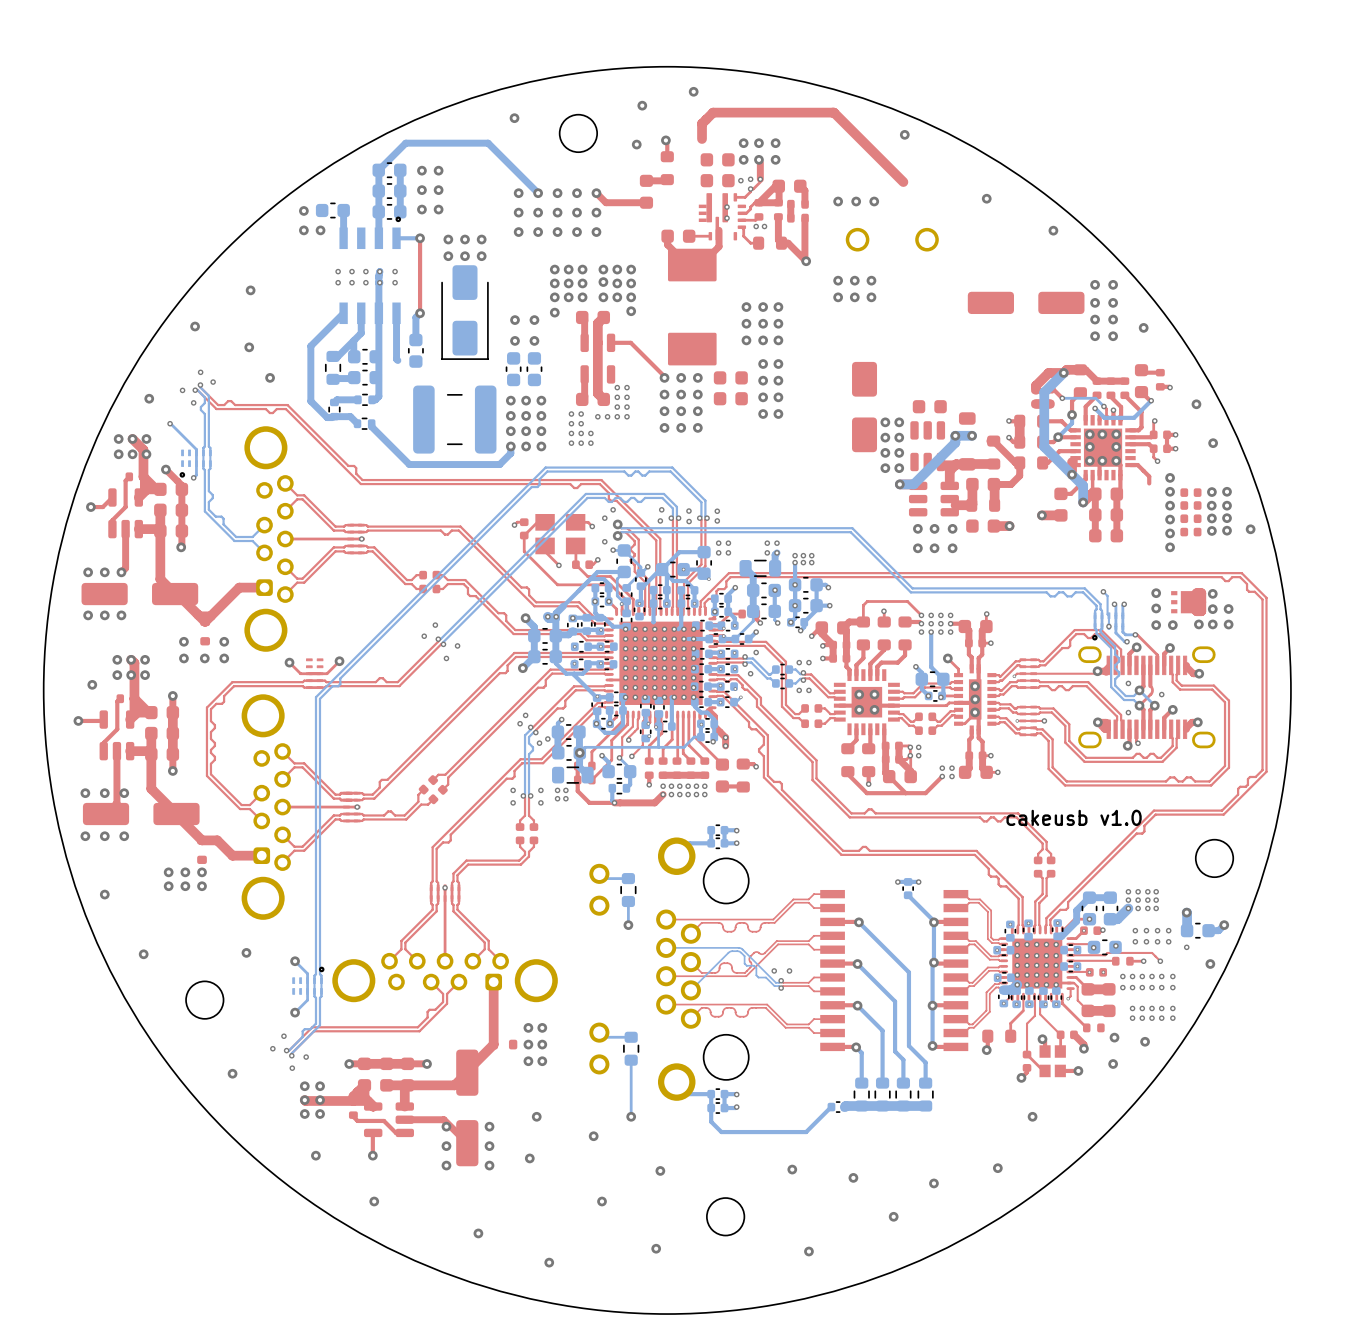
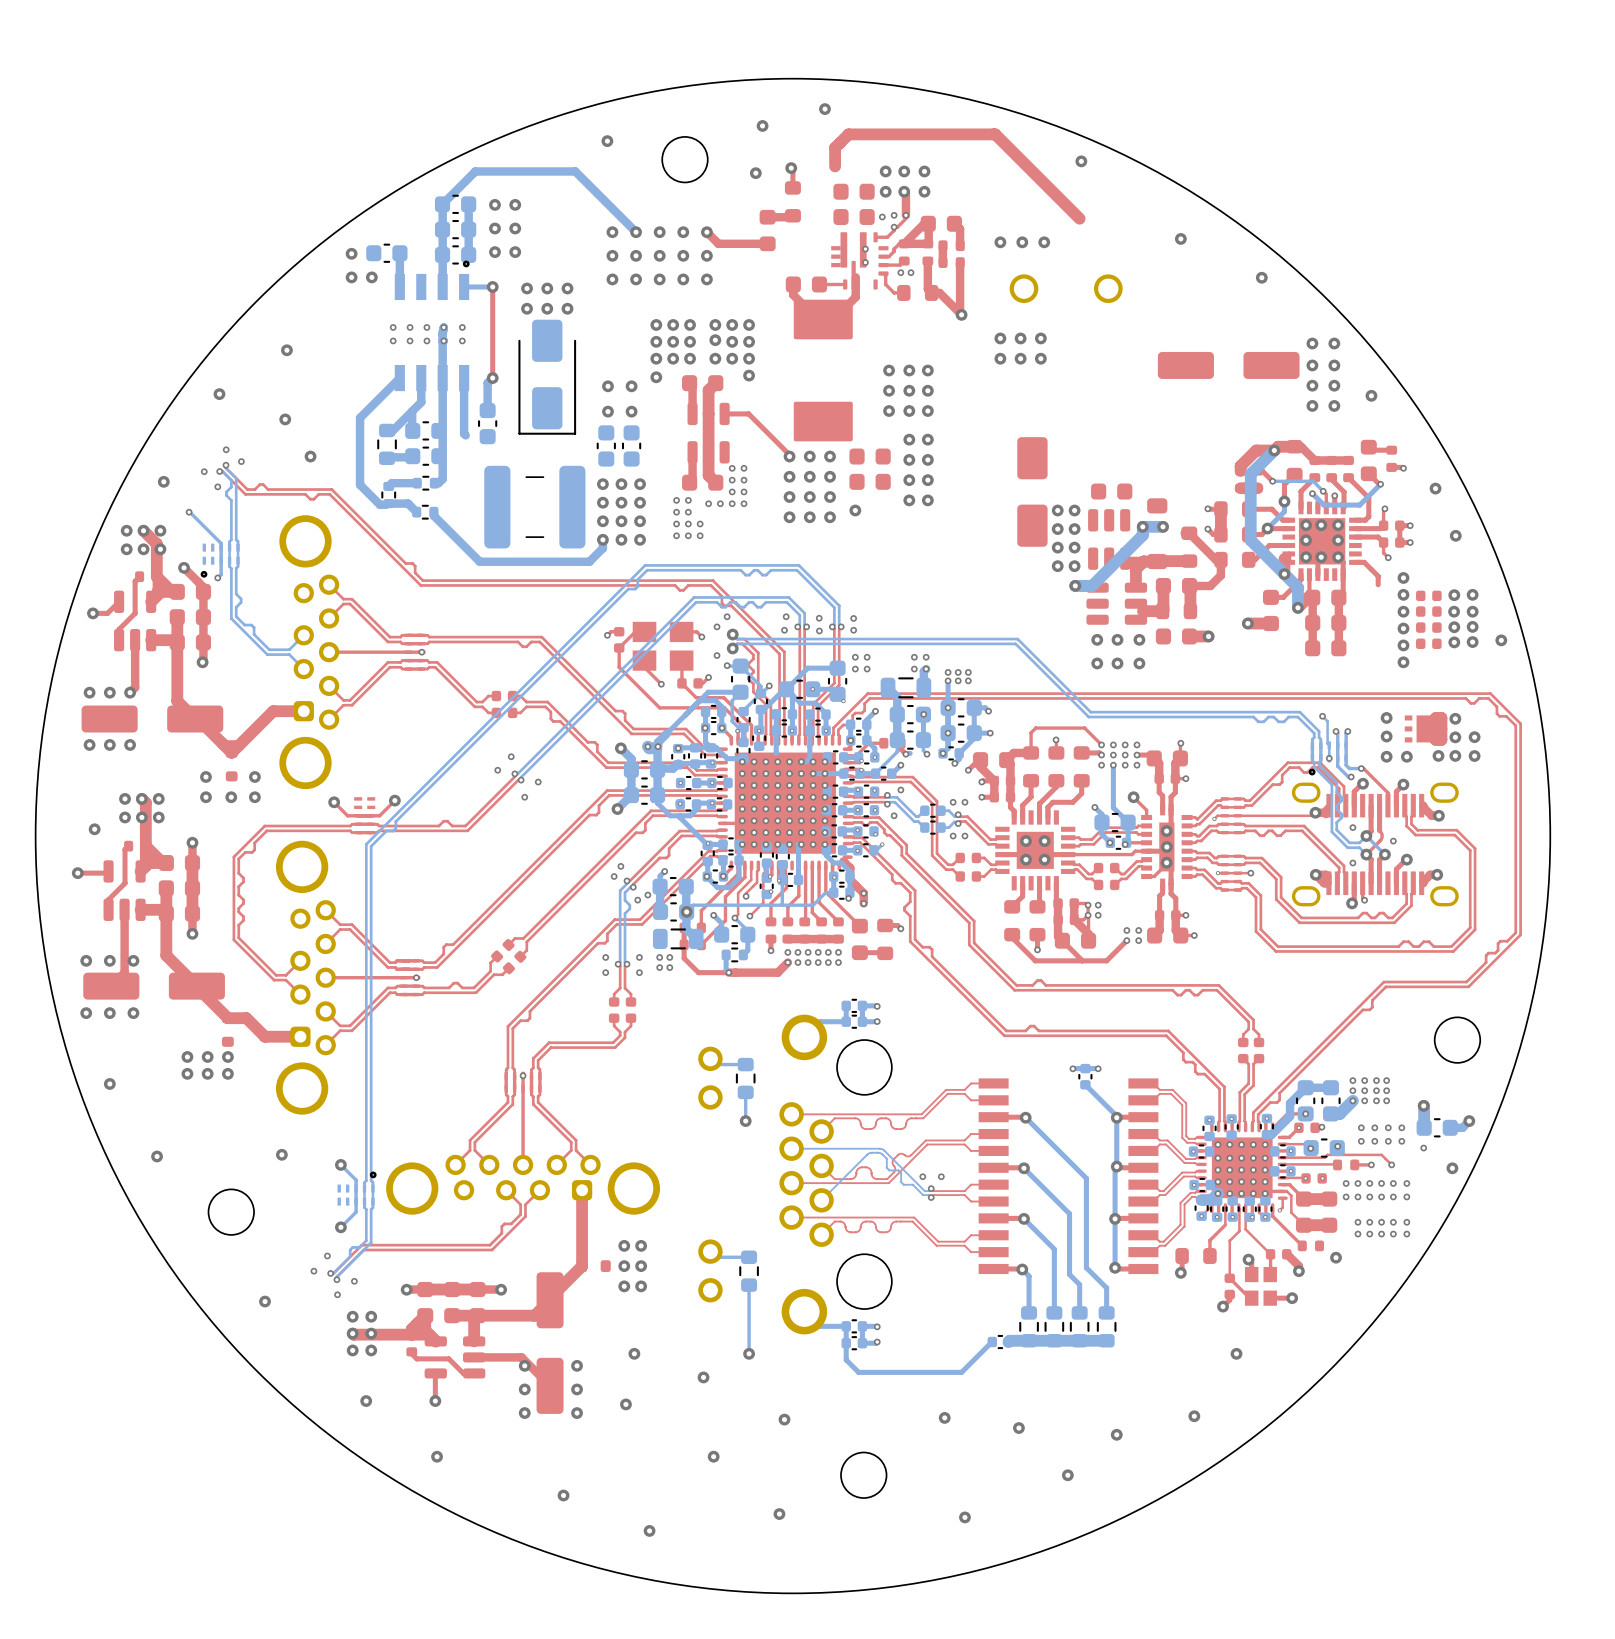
via: none -> (855, 510)
bottom track: none -> (910, 753) (909, 753)
text: cakeusb v1.0 (1074, 817) -> none
via: (1145, 1041) -> none
via: (1113, 1064) -> none

